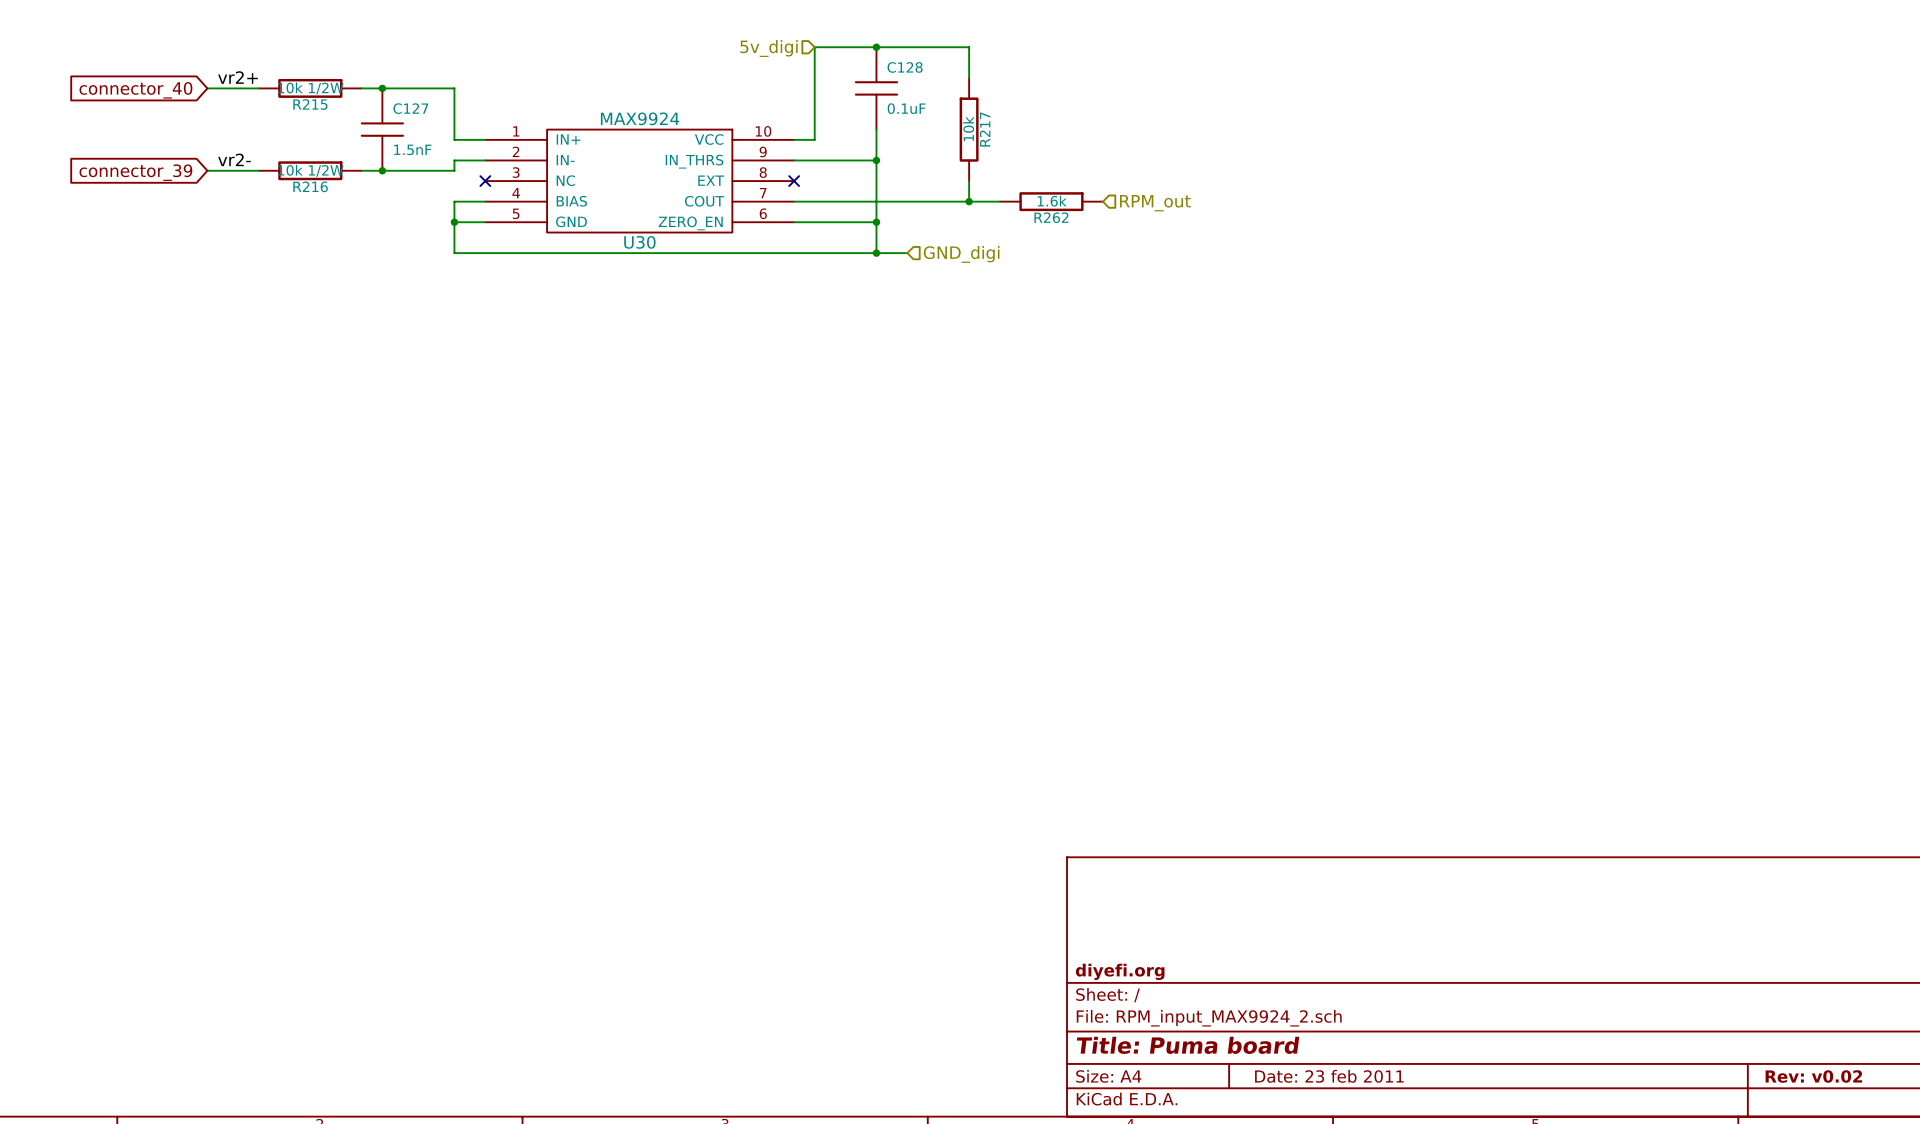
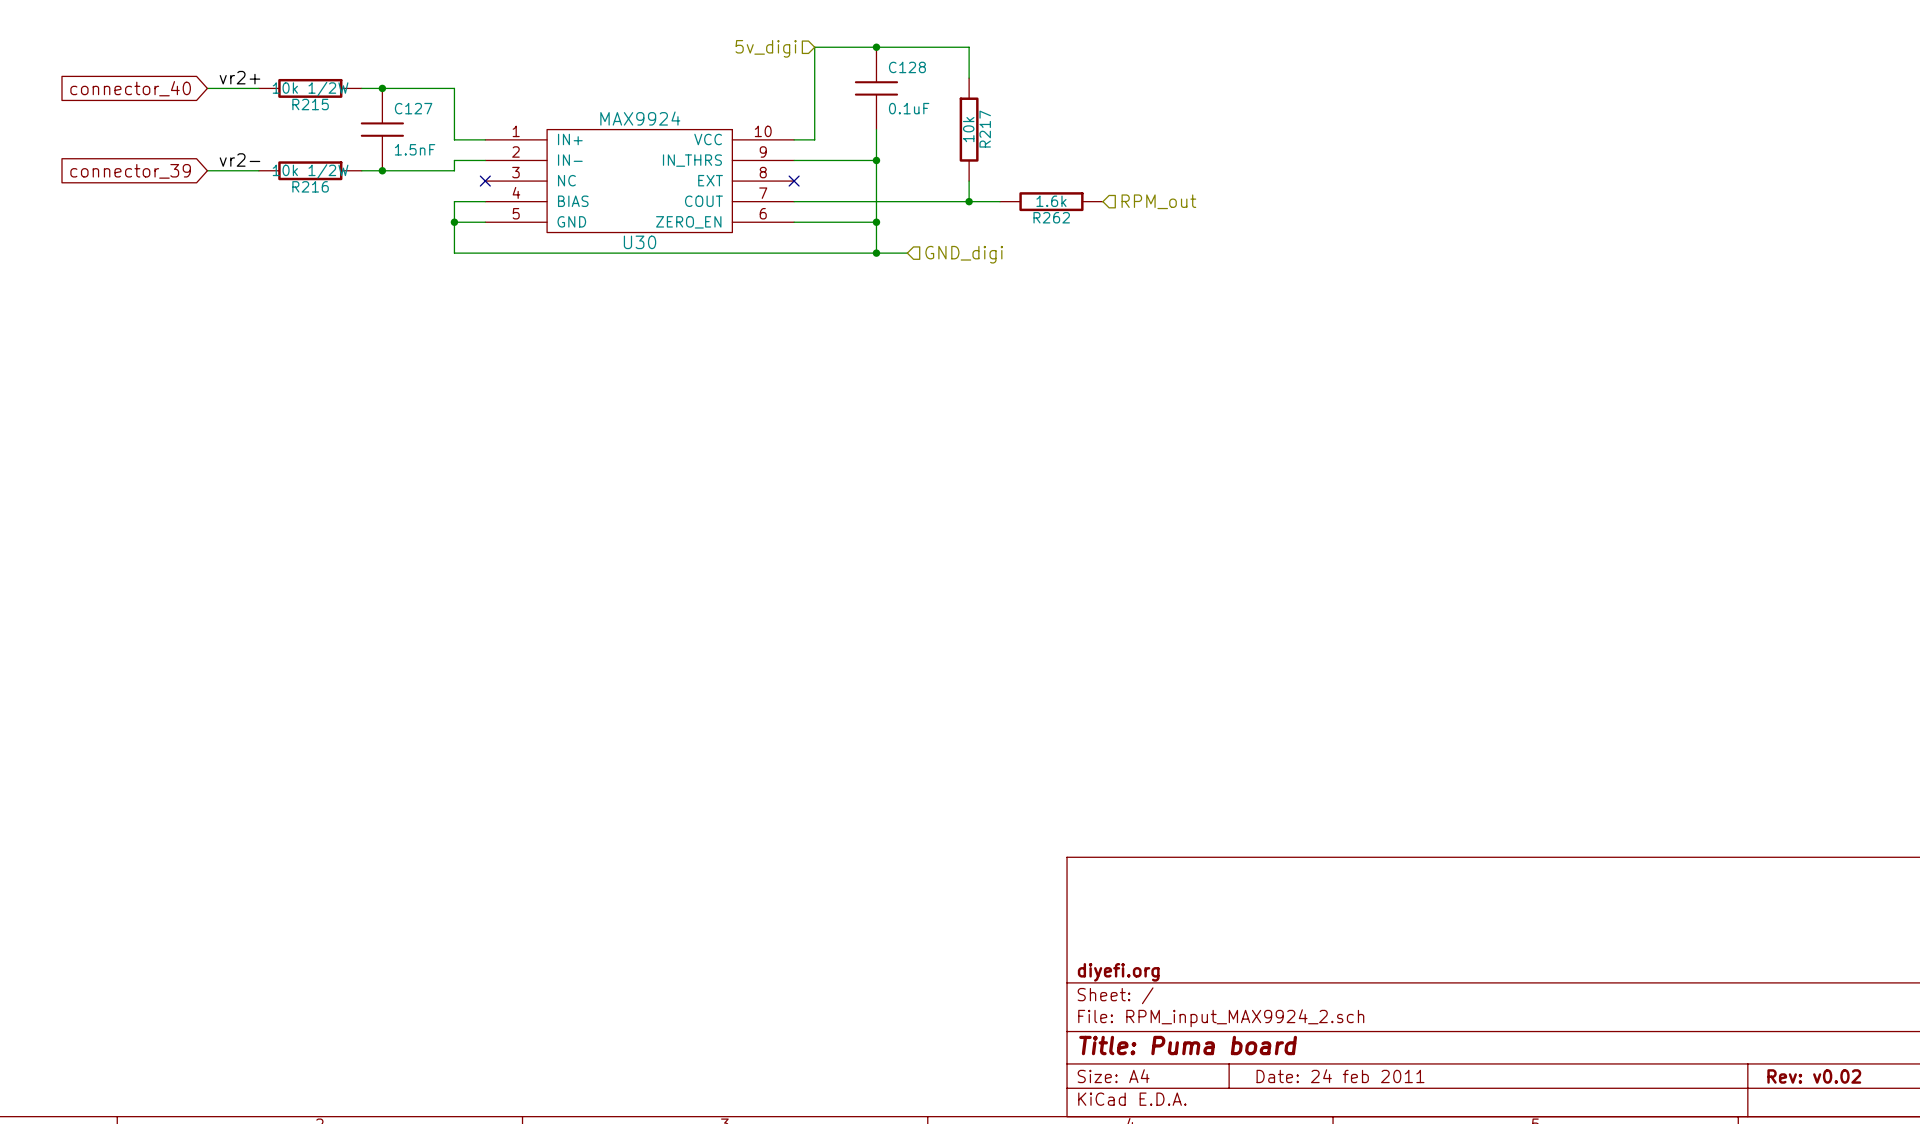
title block: Date: 23 feb 2011 (1329, 1076) -> Date: 24 feb 2011 (1340, 1076)

